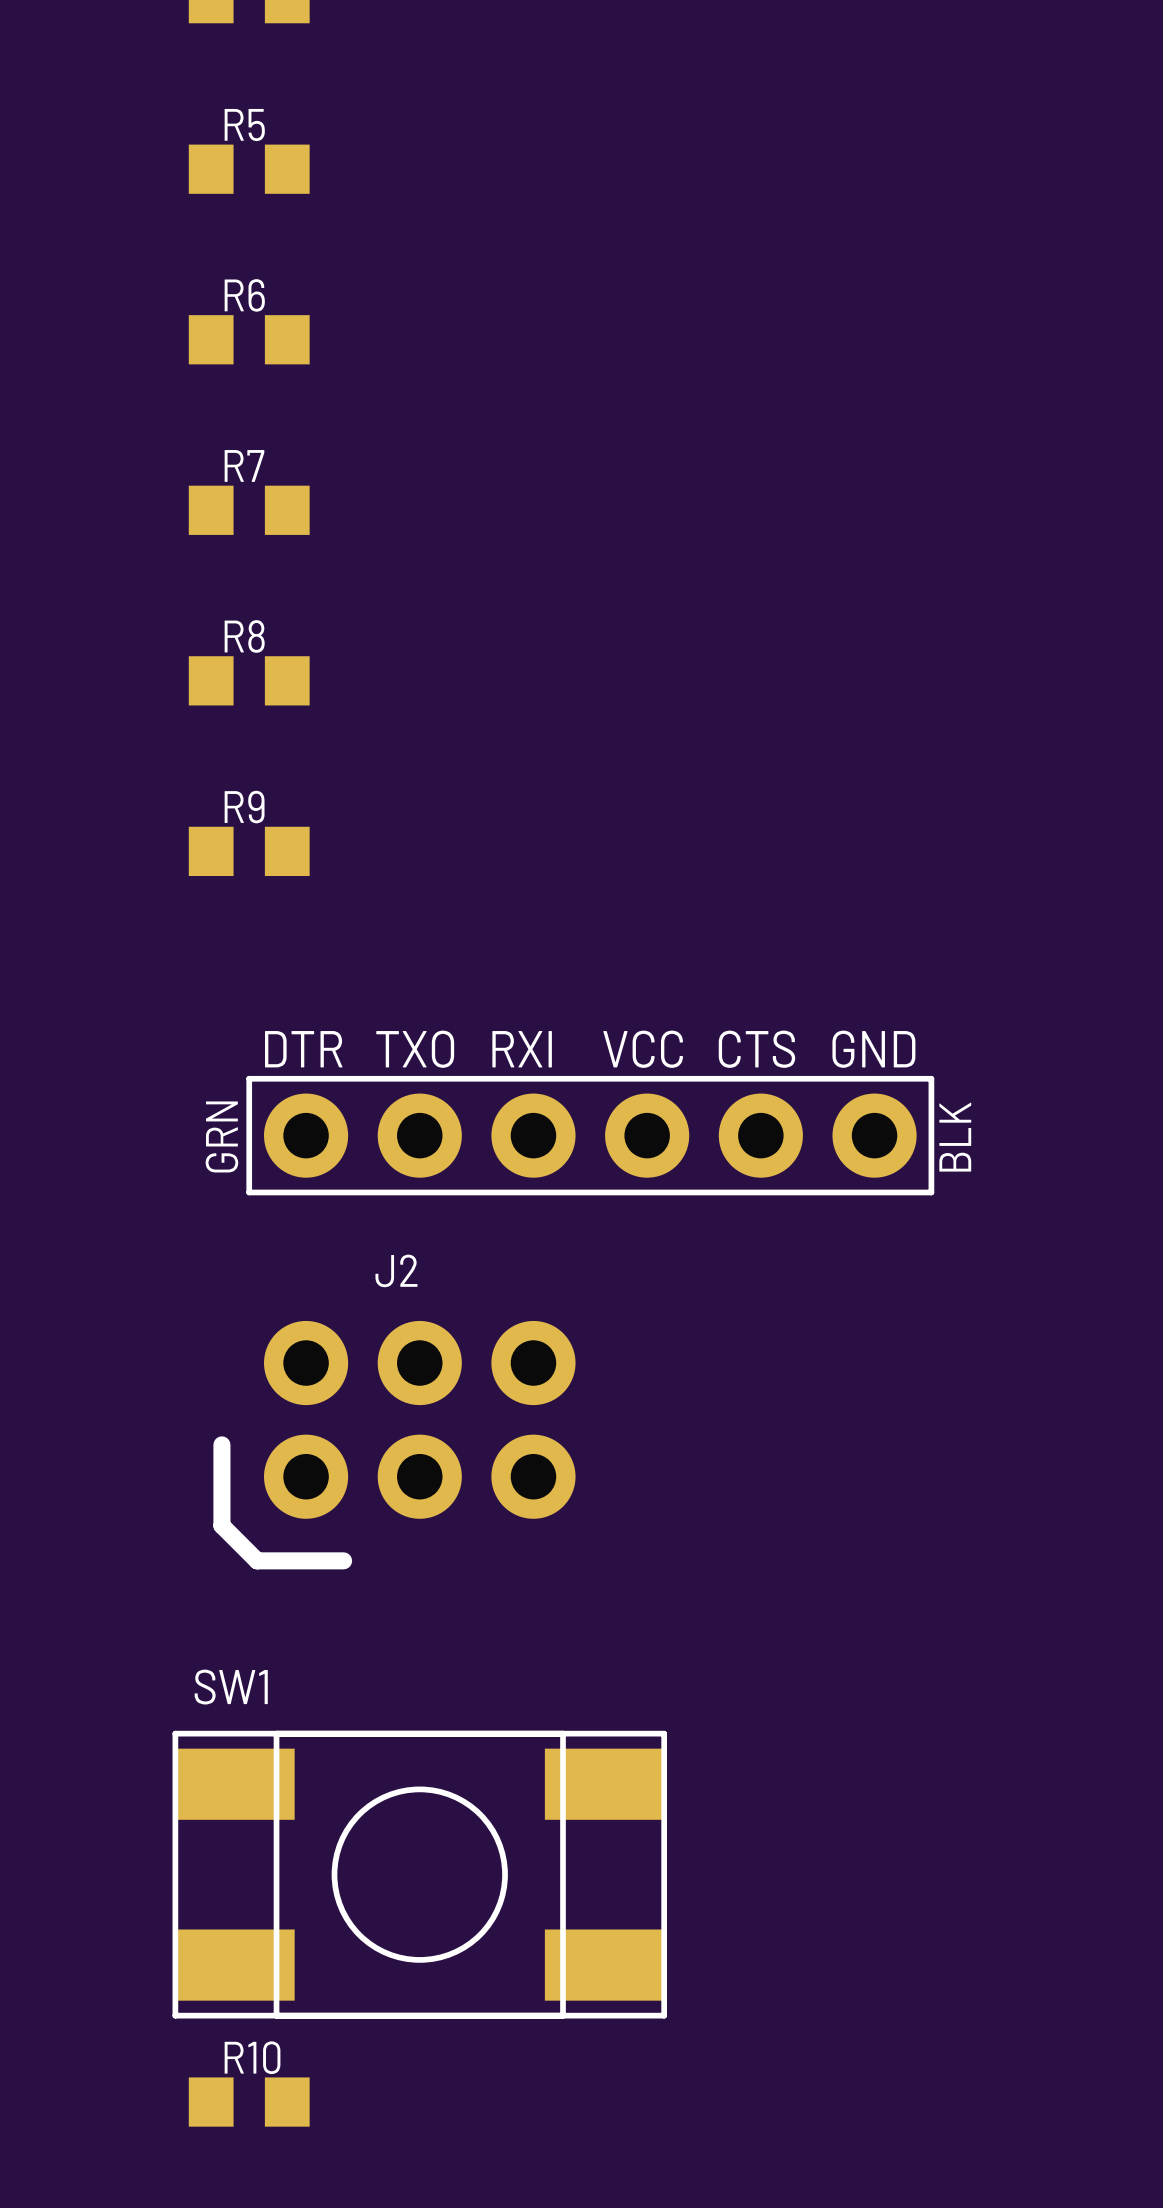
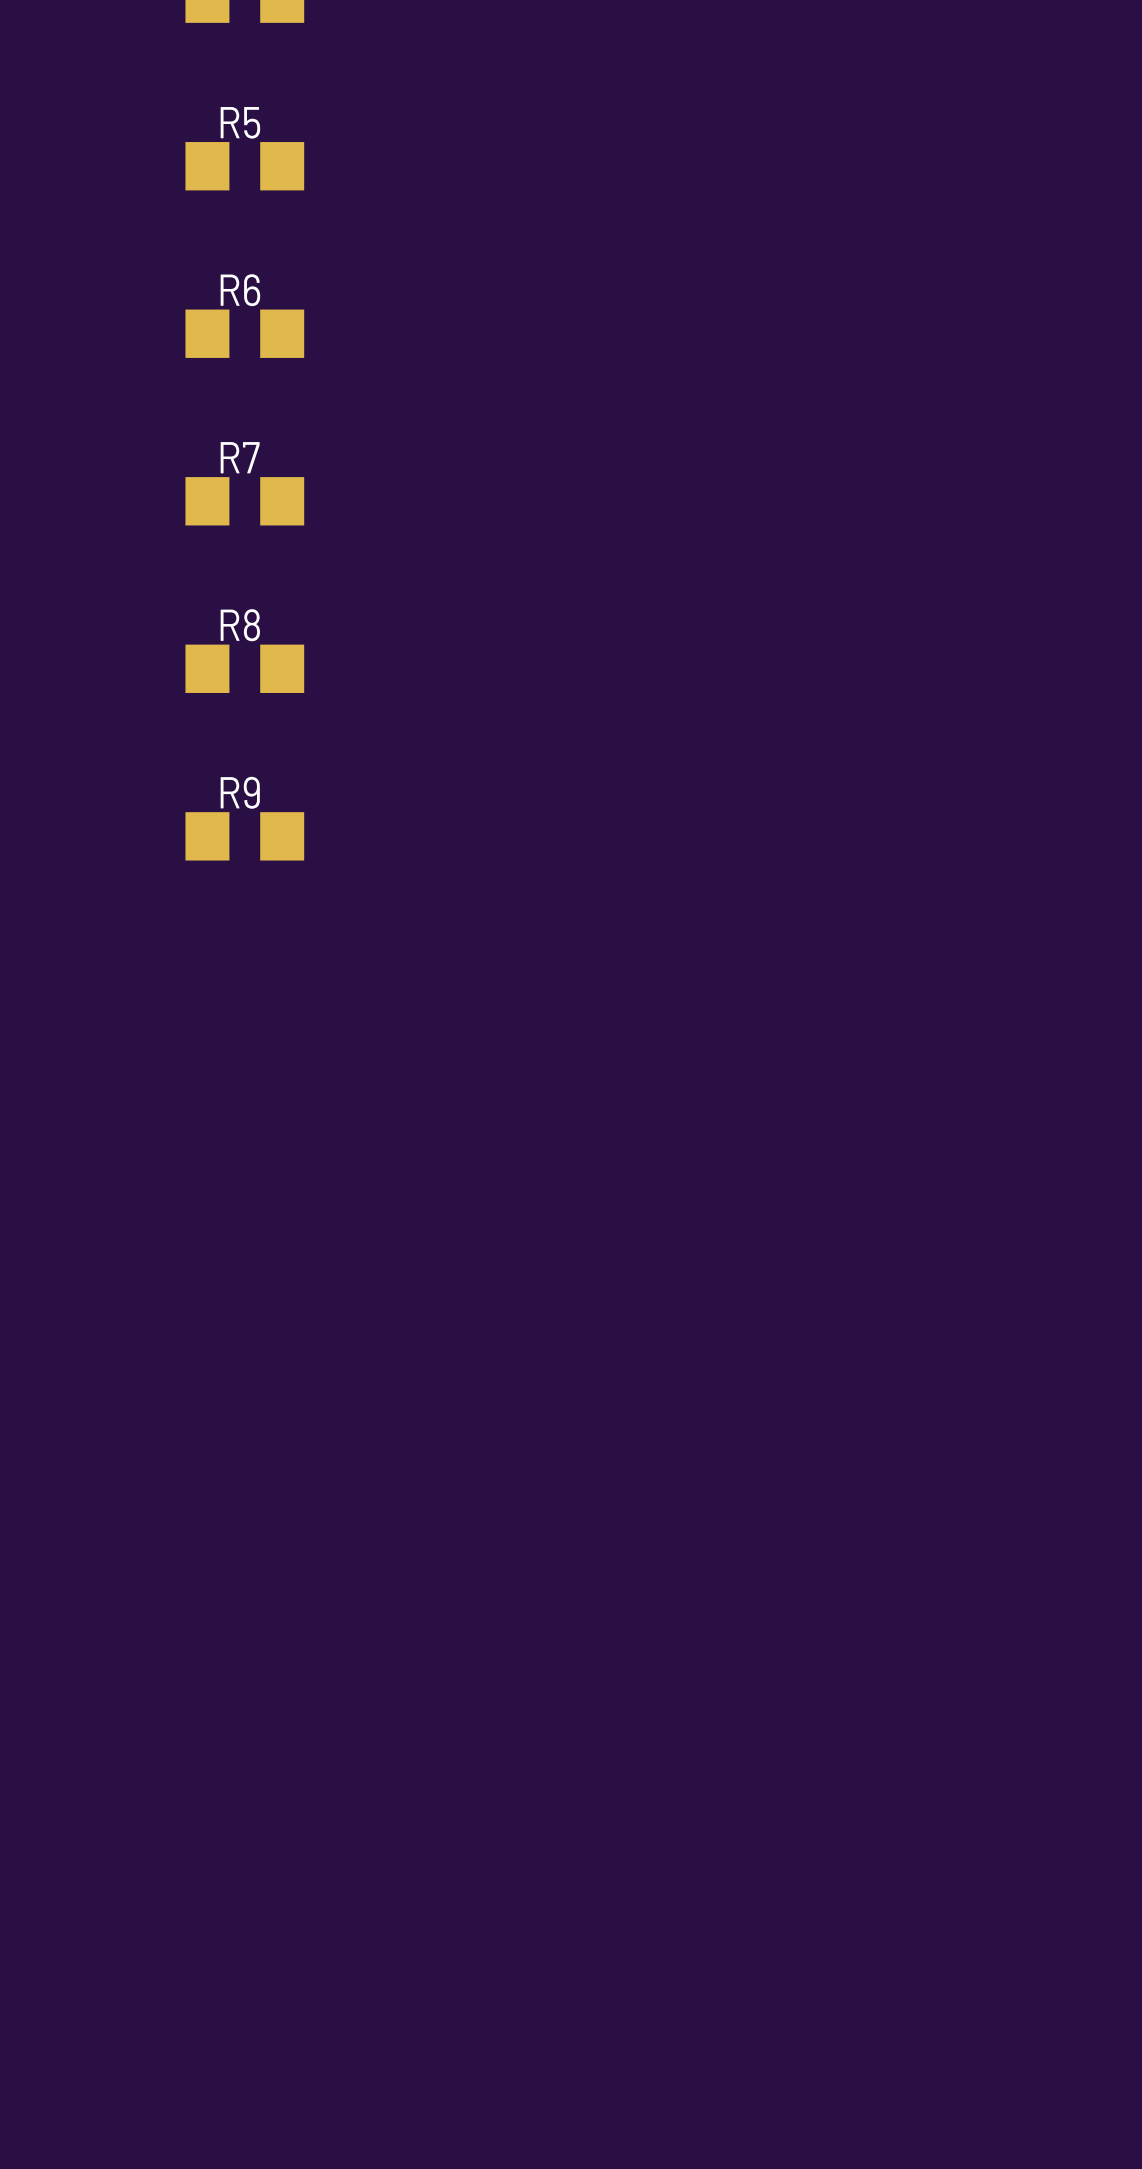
part: (590, 1135) -> none
J2: (394, 1445) -> none
SW1: (419, 1874) -> none
R10: (249, 2102) -> none

